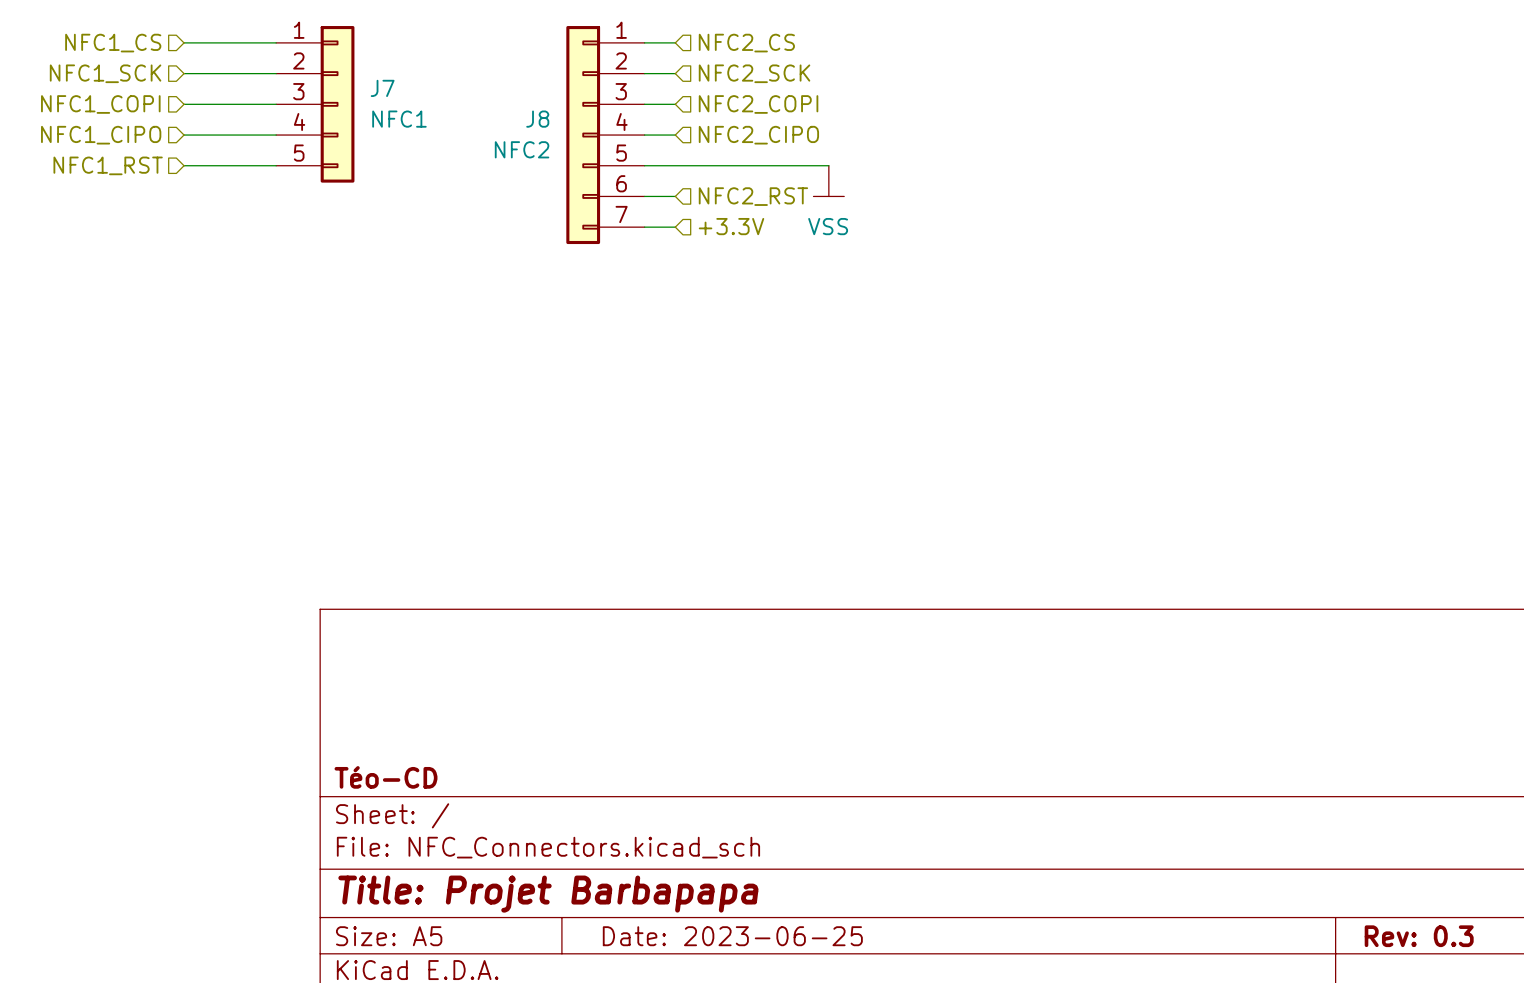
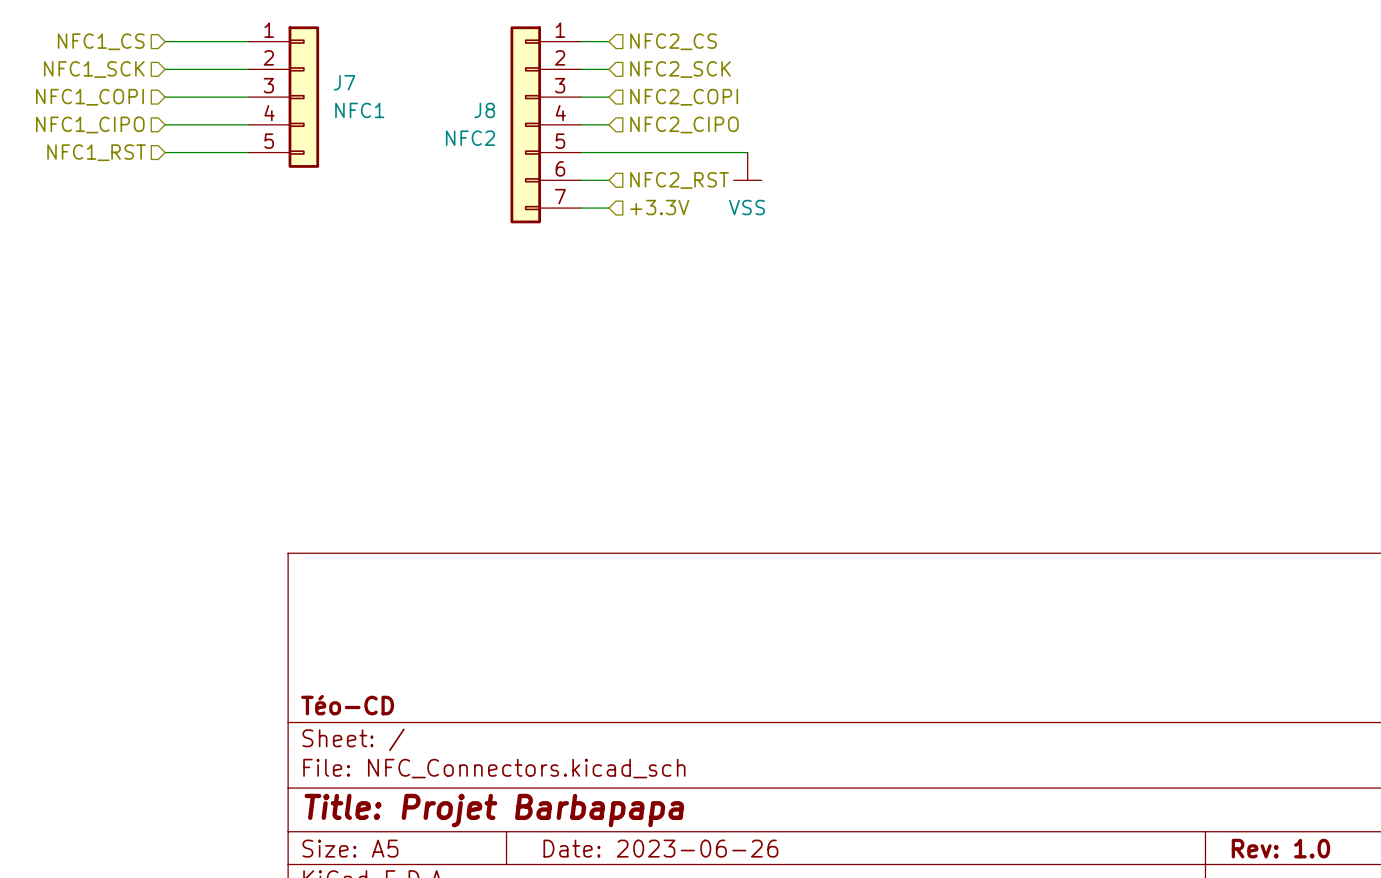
title block: Date: 2023-06-25 (732, 936) -> Date: 2023-06-26 (660, 848)
title block: Rev: 0.3 (1419, 936) -> Rev: 1.0 (1280, 848)

